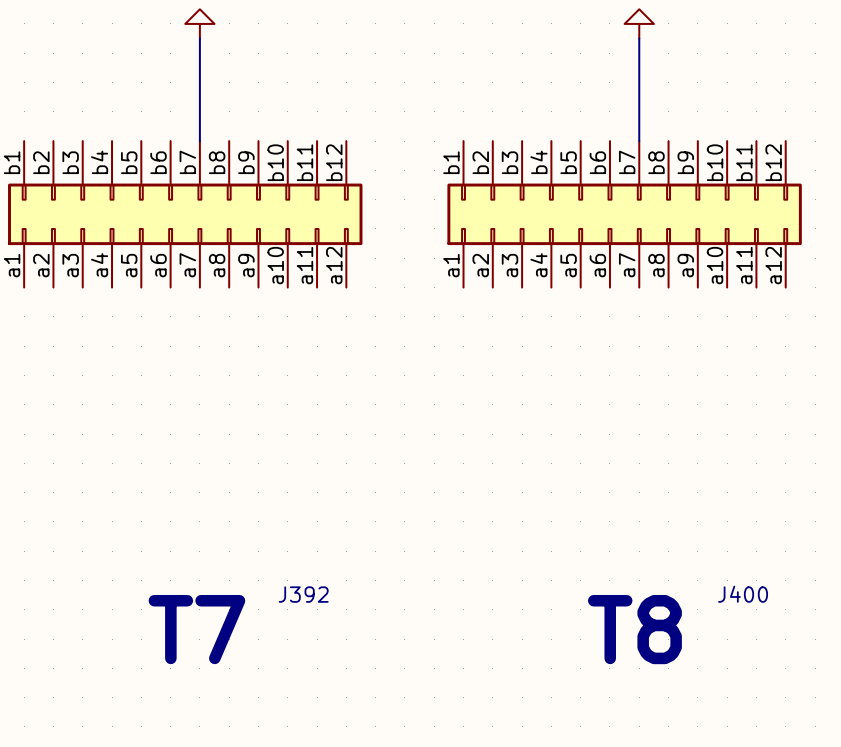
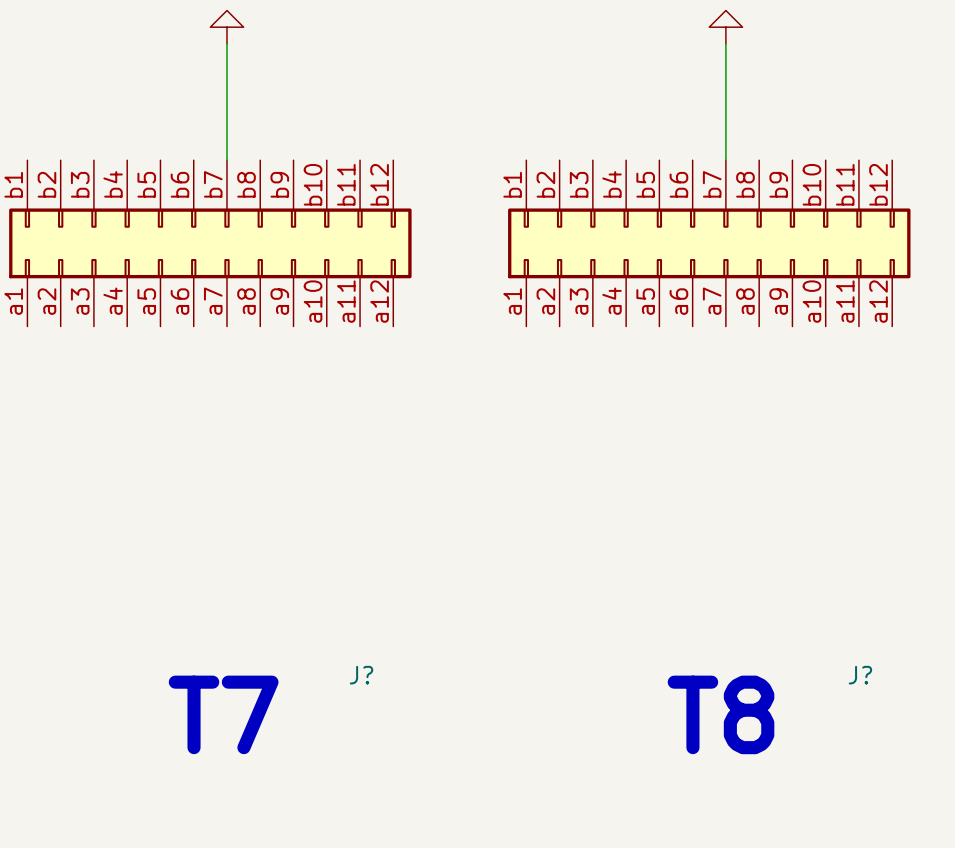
J392 name: J392 (303, 594) -> J? (361, 675)
J400 name: J400 (743, 594) -> J? (860, 675)

